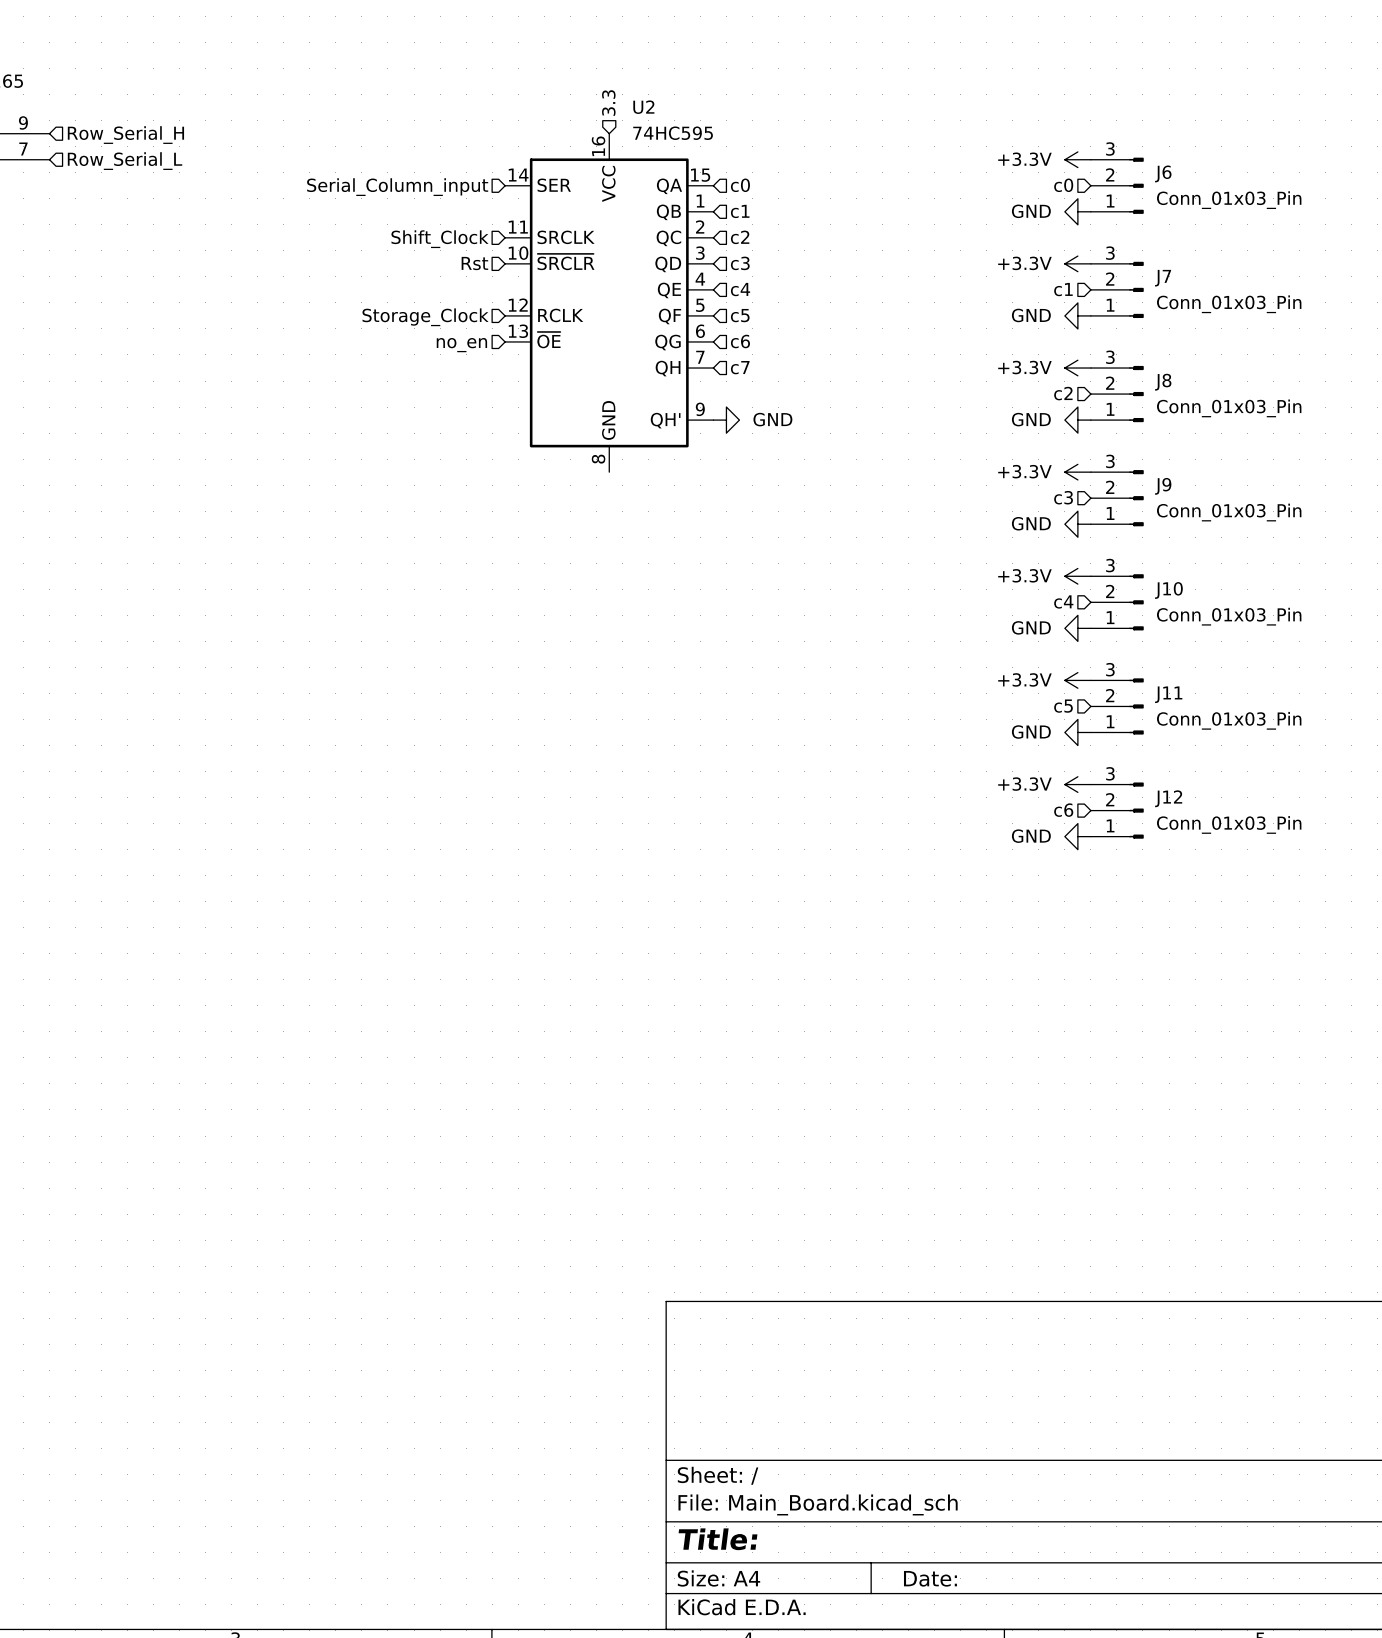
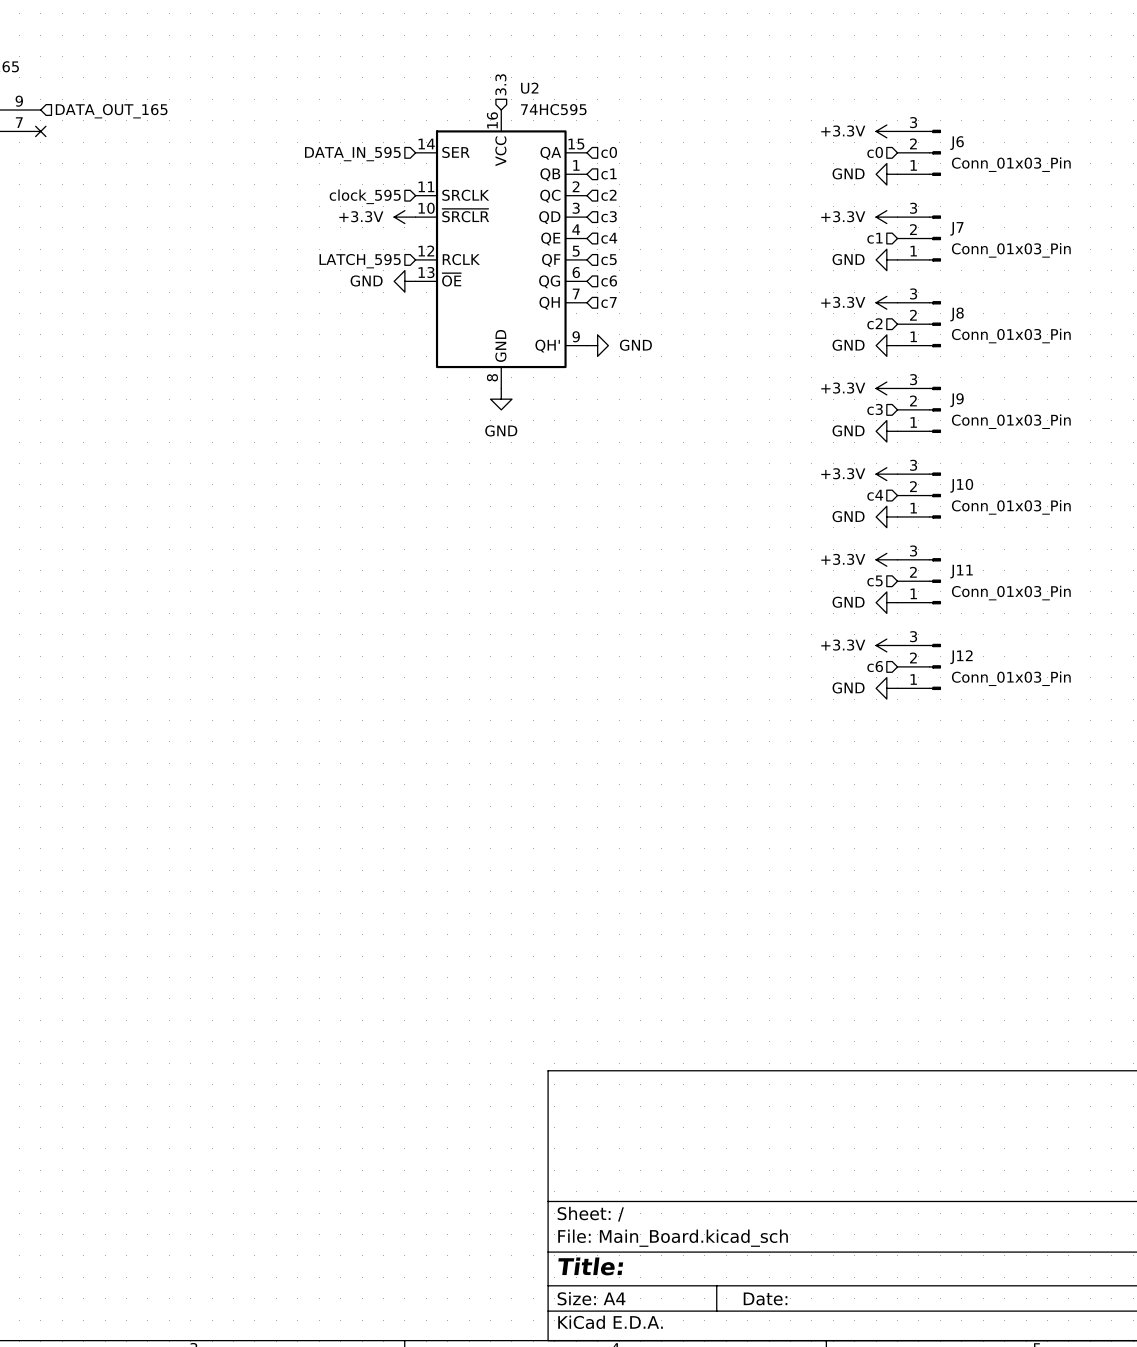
hierarchical label: Row_Serial_H (125, 135) -> DATA_OUT_165 (111, 111)
no-connect mark: none -> (40, 131)
hierarchical label: Row_Serial_L (125, 161) -> none
hierarchical label: Serial_Column_input (397, 187) -> DATA_IN_595 (352, 154)
hierarchical label: Shift_Clock (440, 239) -> clock_595 (365, 196)
hierarchical label: Rst (474, 263) -> none
power symbol: none -> +3.3V (404, 217)
hierarchical label: Storage_Clock (425, 317) -> LATCH_595 (360, 261)
power symbol: none -> GND (404, 281)
hierarchical label: no_en (461, 345) -> none
power symbol: none -> GND (501, 399)

